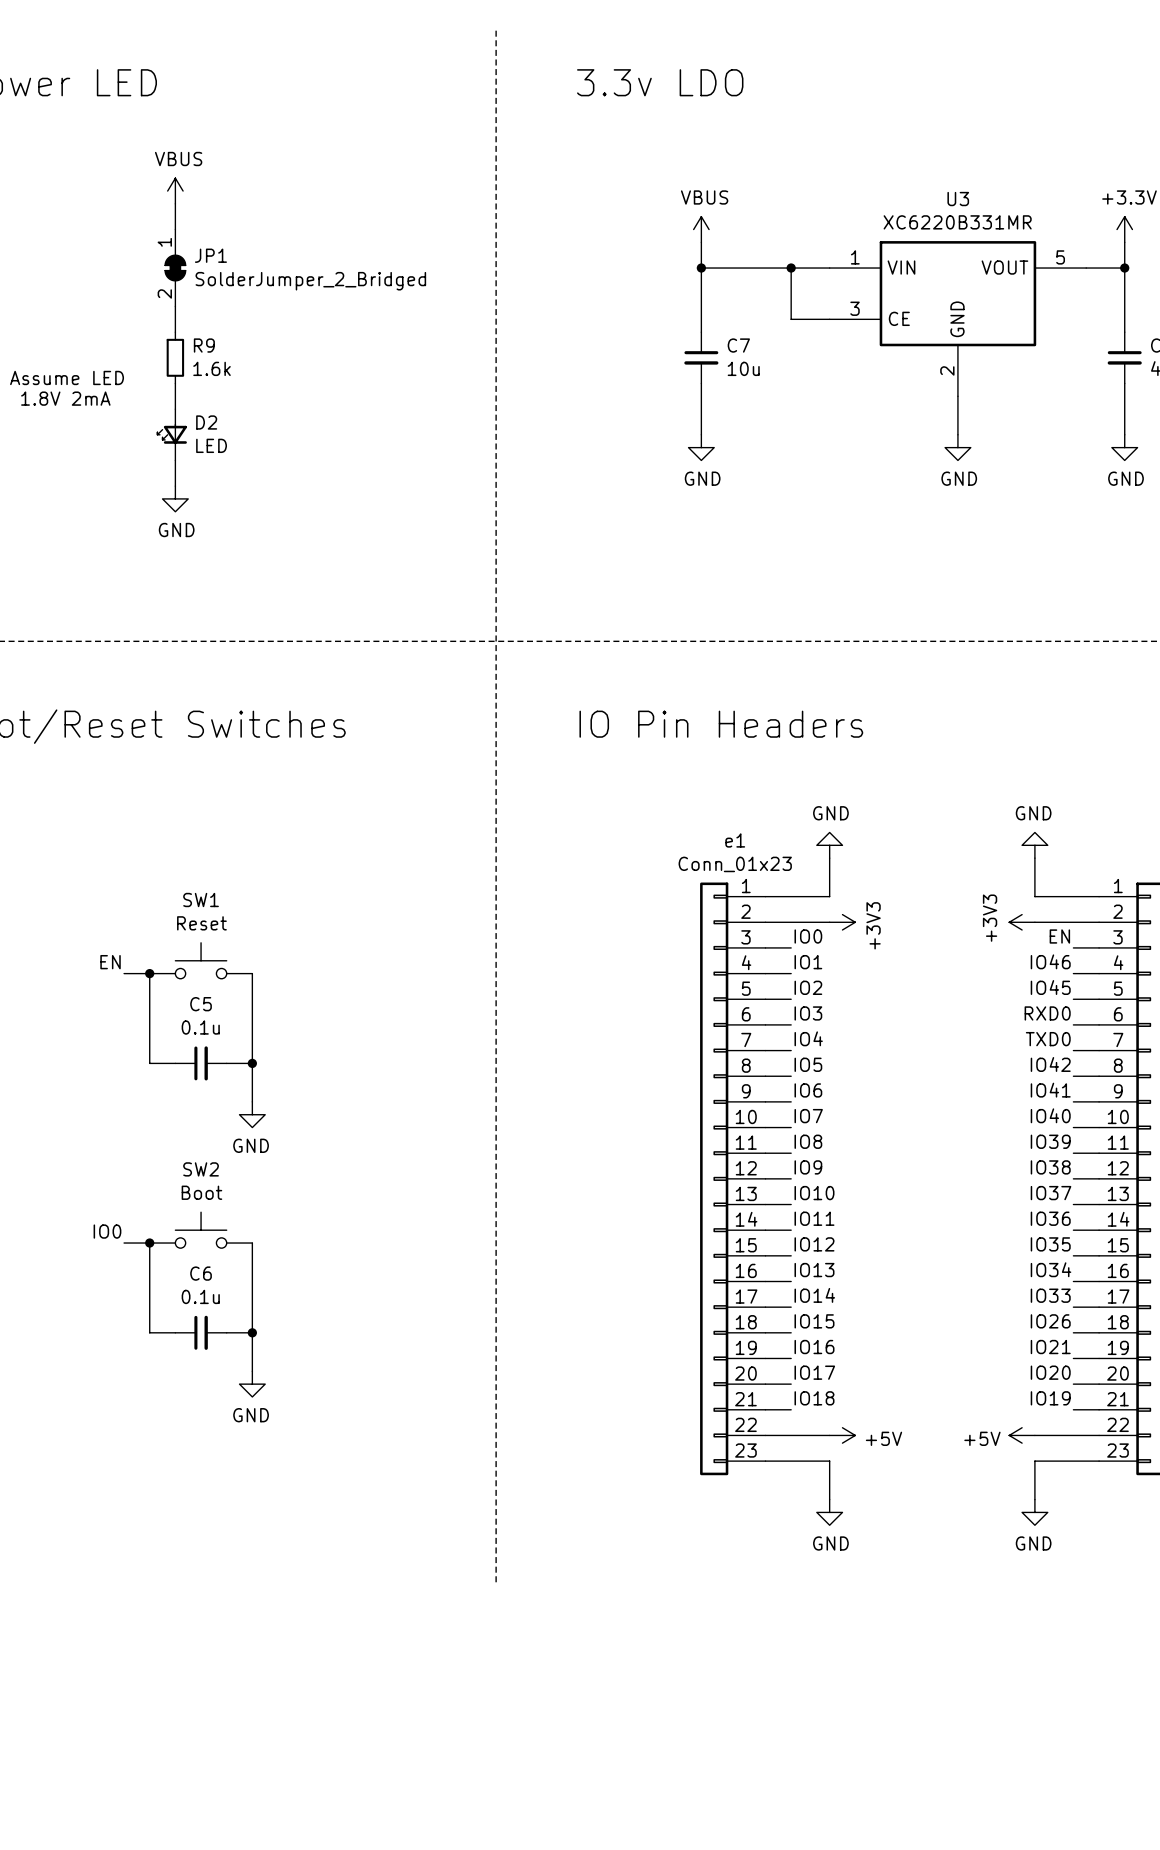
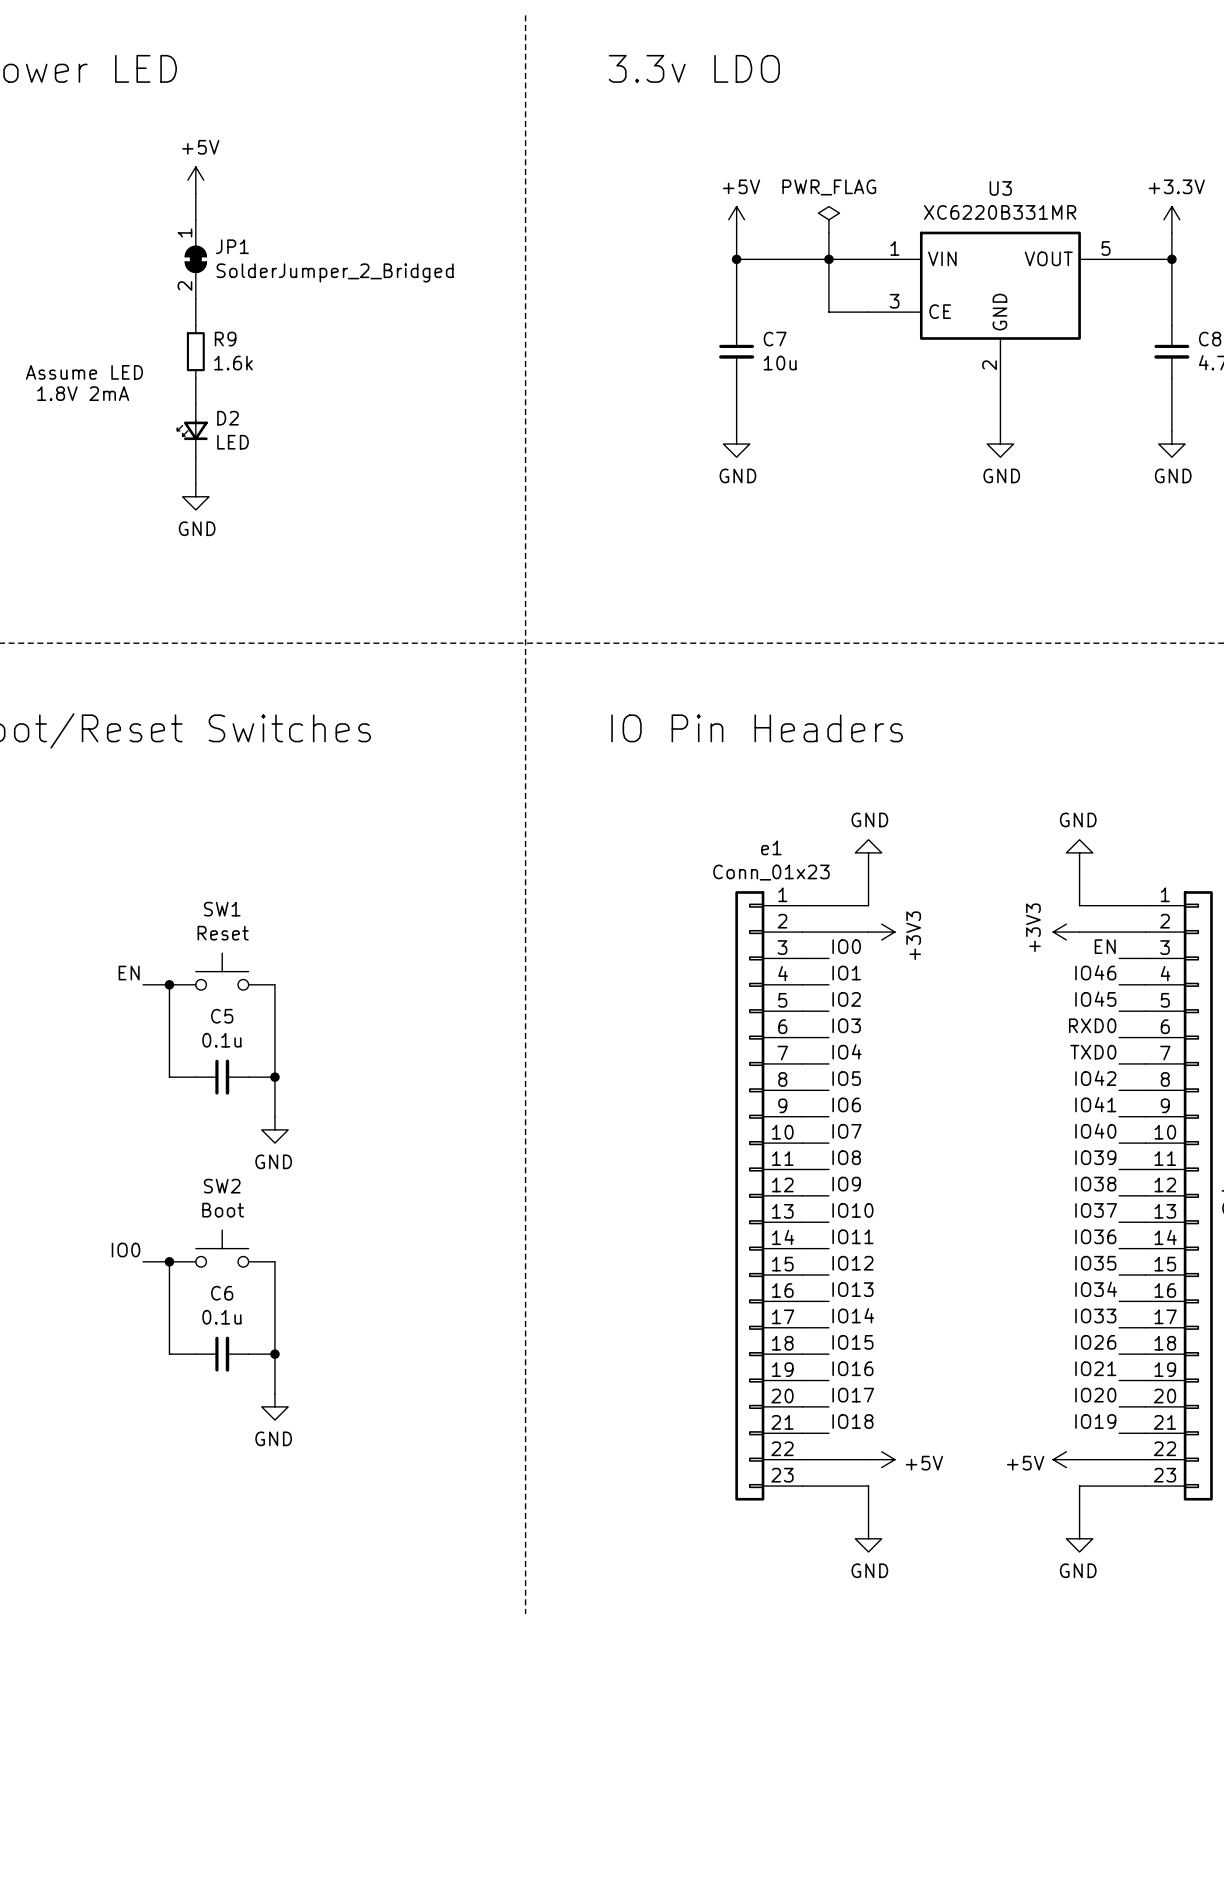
power symbol: VBUS (175, 191) -> +5V (195, 180)
power symbol: VBUS (701, 229) -> +5V (736, 219)
power symbol: none -> PWR_FLAG (828, 219)
wire: none -> (828, 232) (828, 259)

